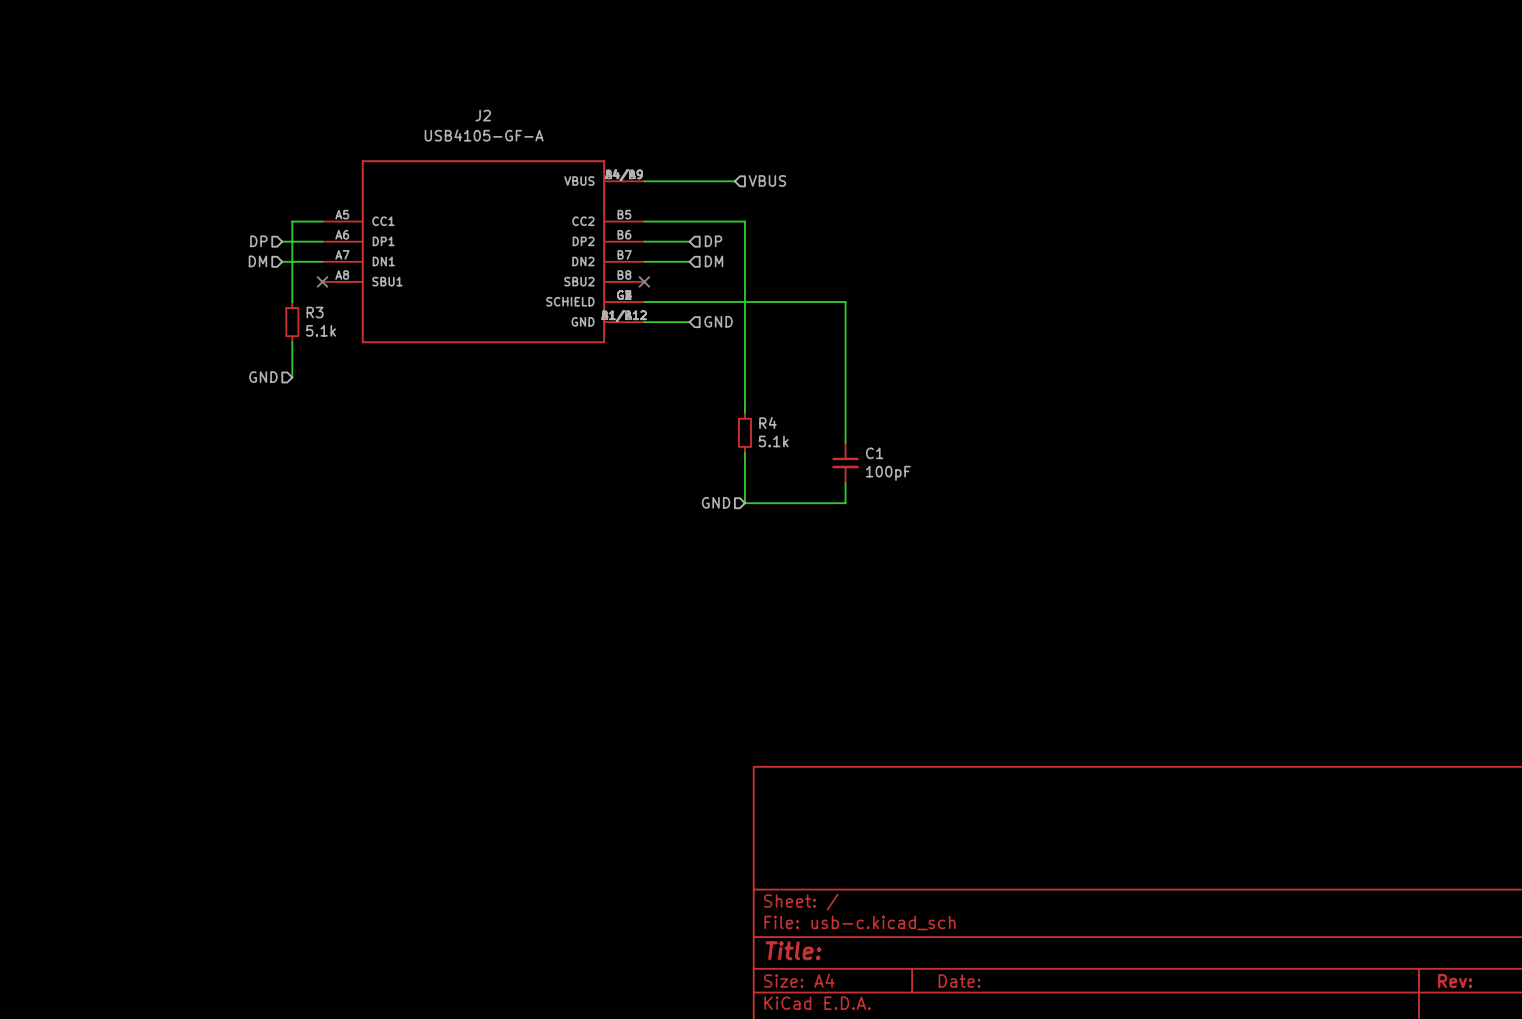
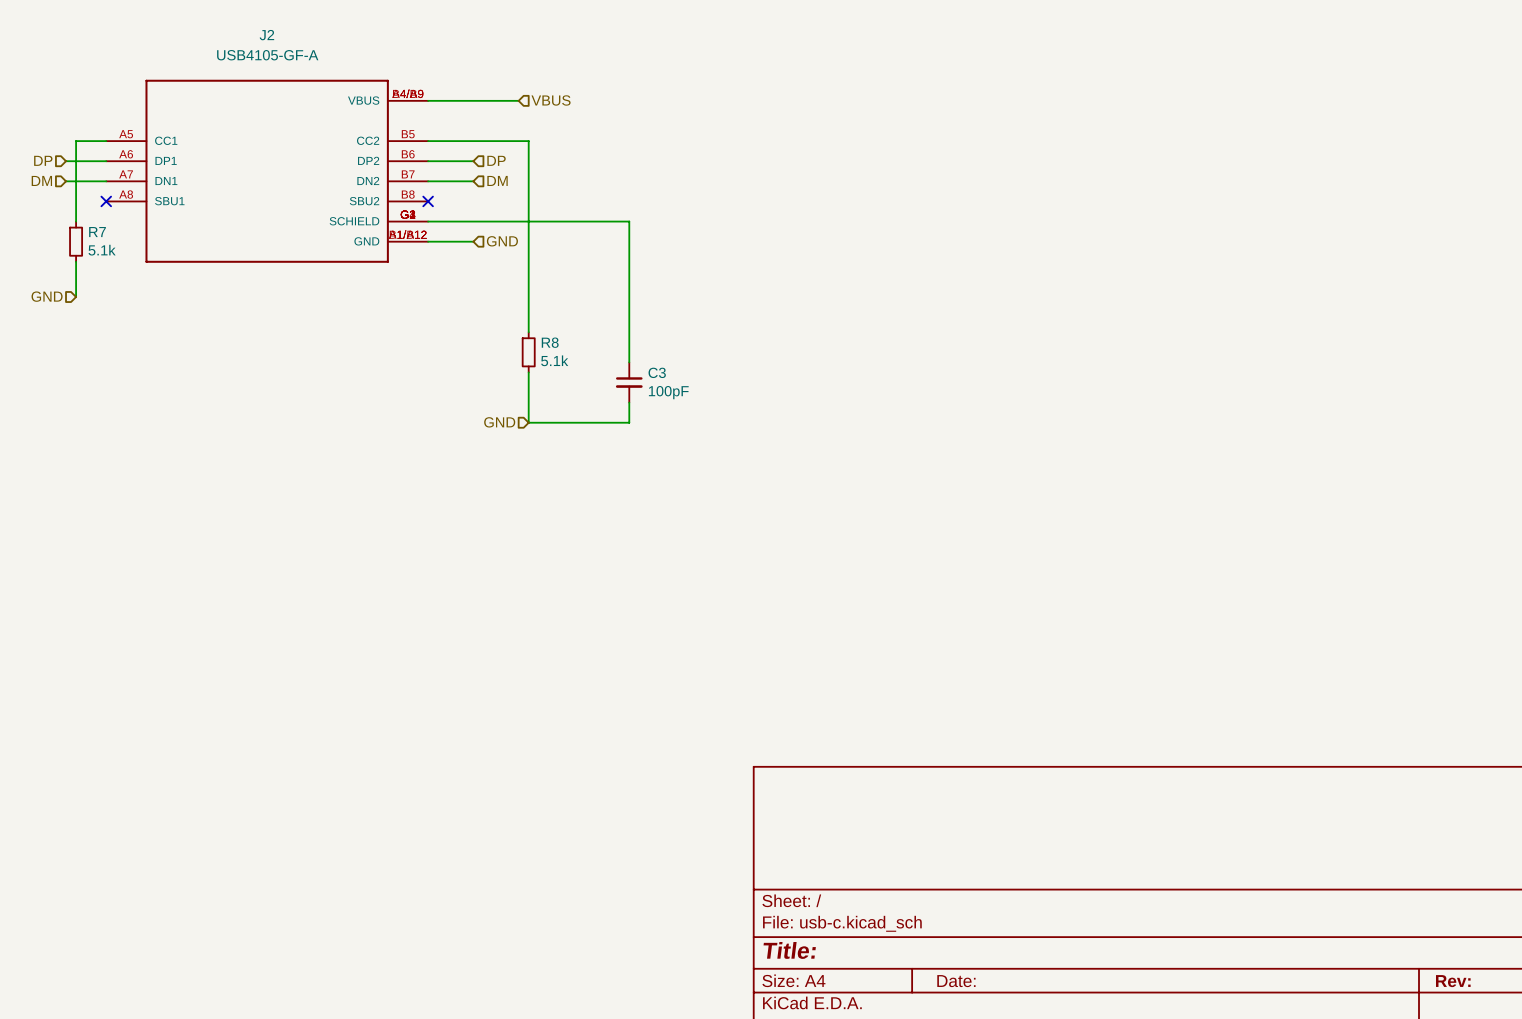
wire: none -> (428, 100) (518, 100)
hierarchical label: none -> VBUS (551, 100)
wire: none -> (106, 141) (76, 141) (76, 221)
wire: none -> (428, 141) (528, 141) (528, 332)
hierarchical label: none -> DP (43, 160)
hierarchical label: none -> DP (496, 160)
wire: none -> (66, 161) (106, 161)
hierarchical label: none -> DM (41, 180)
hierarchical label: none -> DM (497, 180)
hierarchical label: VBUS (767, 180) -> none
wire: none -> (66, 181) (106, 181)
wire: none -> (428, 181) (473, 181)
wire: (644, 181) (734, 181) -> none
no-connect mark: none -> (106, 201)
no-connect mark: none -> (428, 201)
wire: (322, 221) (292, 221) (292, 302) -> none
wire: none -> (428, 221) (629, 221) (629, 362)
wire: (644, 221) (744, 221) (744, 412) -> none
R7: none -> 5.1k (76, 241)
hierarchical label: DP (258, 241) -> none
wire: (282, 241) (322, 241) -> none
wire: none -> (428, 241) (473, 241)
hierarchical label: none -> GND (502, 241)
wire: (644, 241) (689, 241) -> none
hierarchical label: DP (713, 241) -> none
J2 position: (483, 251) -> (267, 171)
wire: none -> (76, 261) (76, 297)
hierarchical label: DM (257, 261) -> none
wire: (644, 261) (689, 261) -> none
hierarchical label: DM (713, 261) -> none
no-connect mark: (322, 281) -> none
no-connect mark: (644, 281) -> none
hierarchical label: none -> GND (47, 296)
wire: (644, 302) (845, 302) (845, 442) -> none
hierarchical label: GND (718, 321) -> none
R3: 5.1k (292, 322) -> none
wire: (644, 322) (689, 322) -> none
wire: (292, 342) (292, 377) -> none
R8: none -> 5.1k (528, 352)
wire: none -> (528, 372) (528, 422) (629, 422) (629, 402)
hierarchical label: GND (263, 377) -> none
C3: none -> 100pF (629, 382)
hierarchical label: none -> GND (499, 422)
R4: 5.1k (744, 432) -> none
wire: (744, 452) (744, 503) (845, 503) (845, 483) -> none
C1: 100pF (845, 462) -> none
hierarchical label: GND (716, 502) -> none

